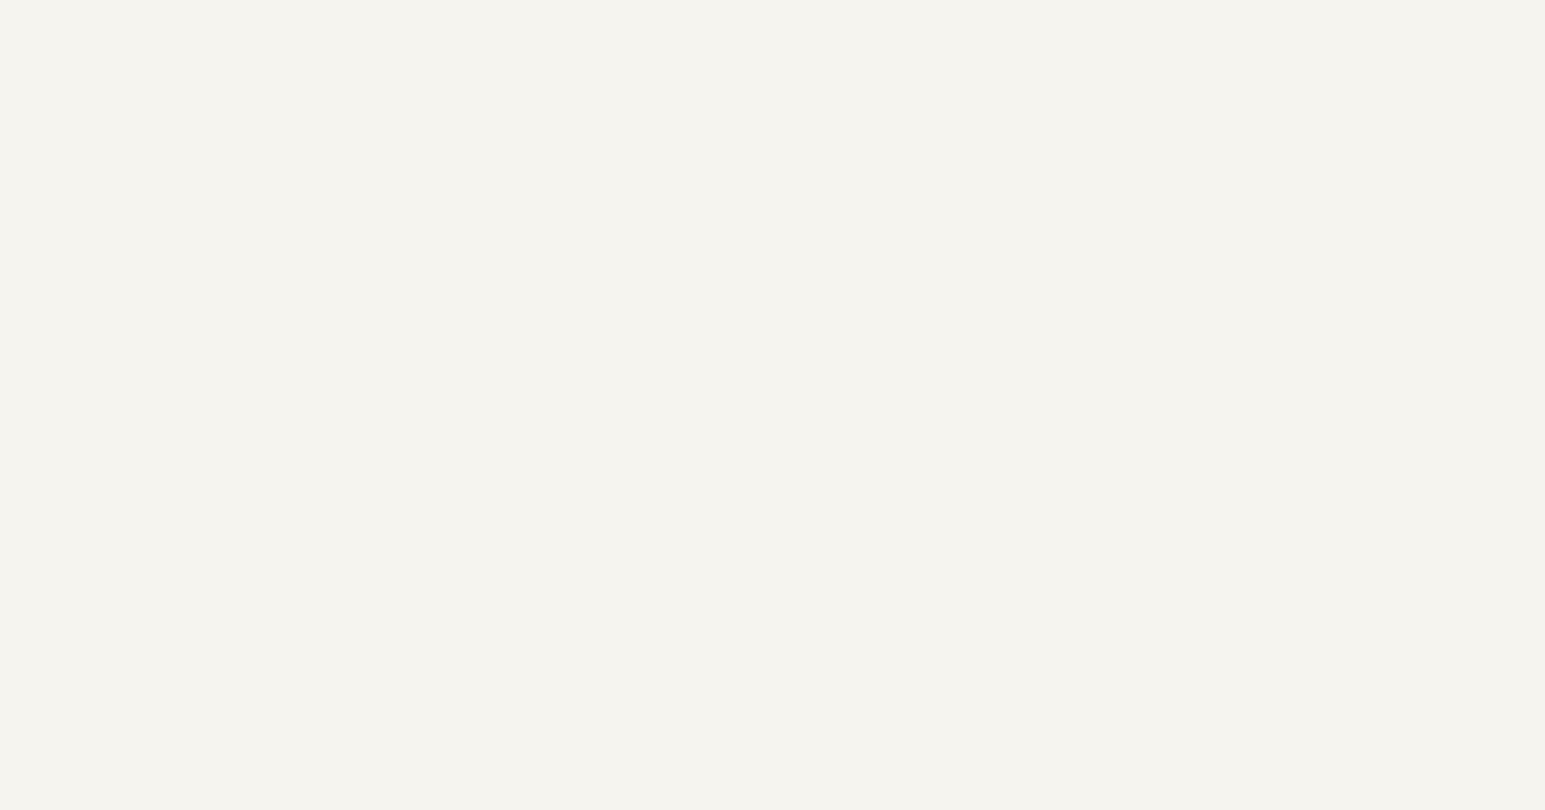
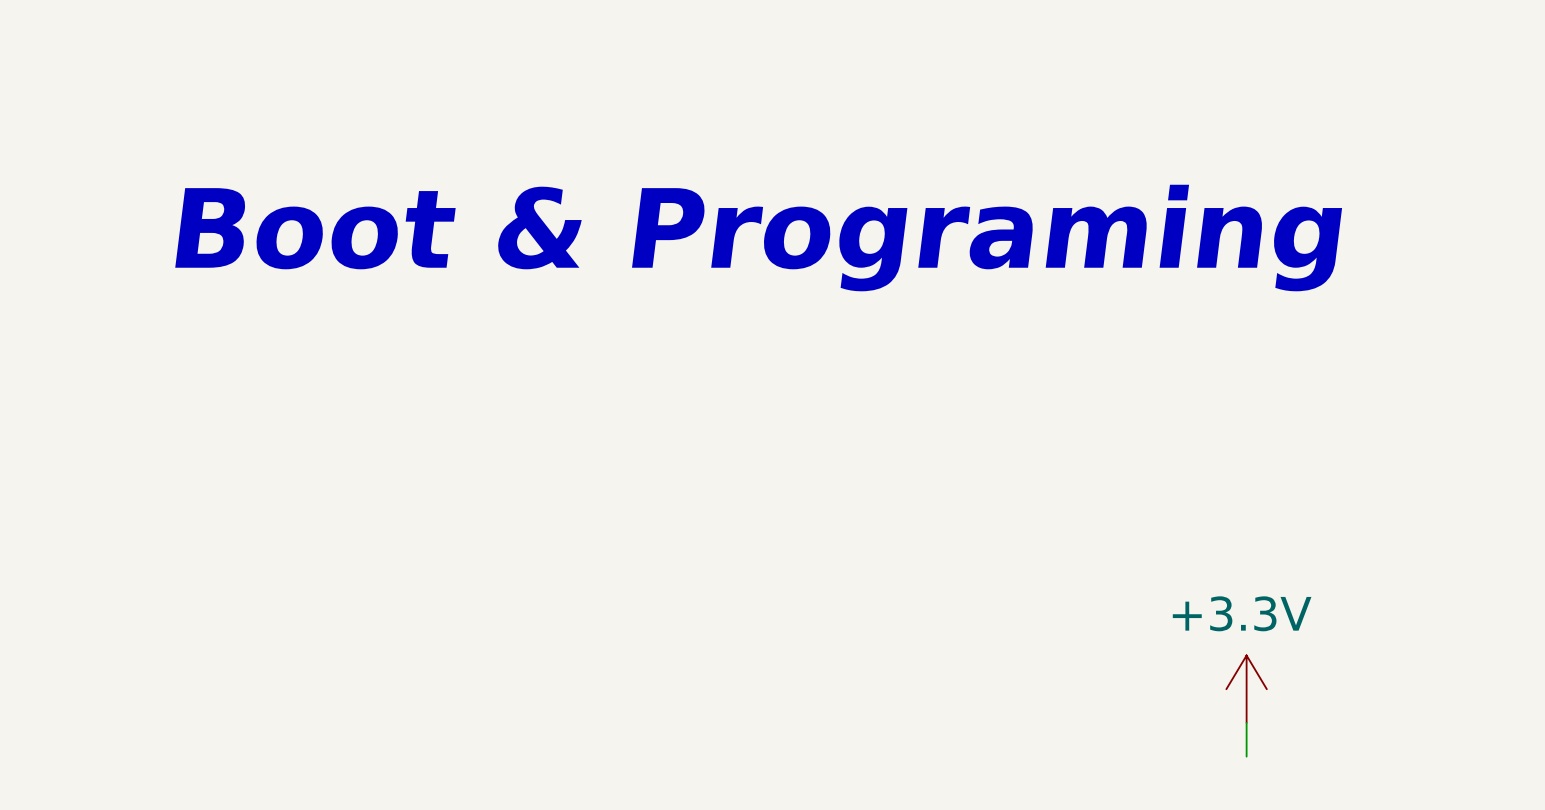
text: none -> Boot & Programing (758, 238)
power symbol: none -> +3.3V (1246, 689)
wire: none -> (1246, 722) (1246, 756)

